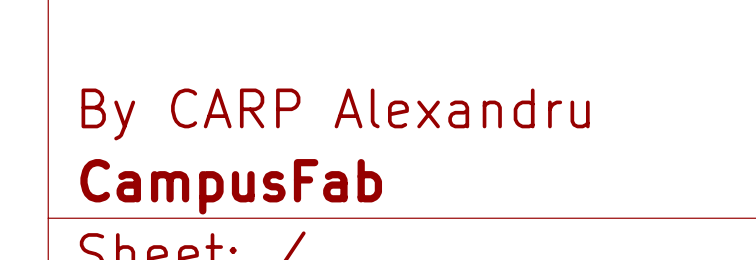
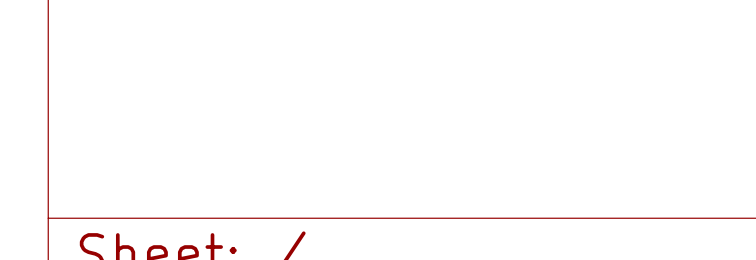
title block: By CARP Alexandru (335, 114) -> none
title block: CampusFab (231, 186) -> none

